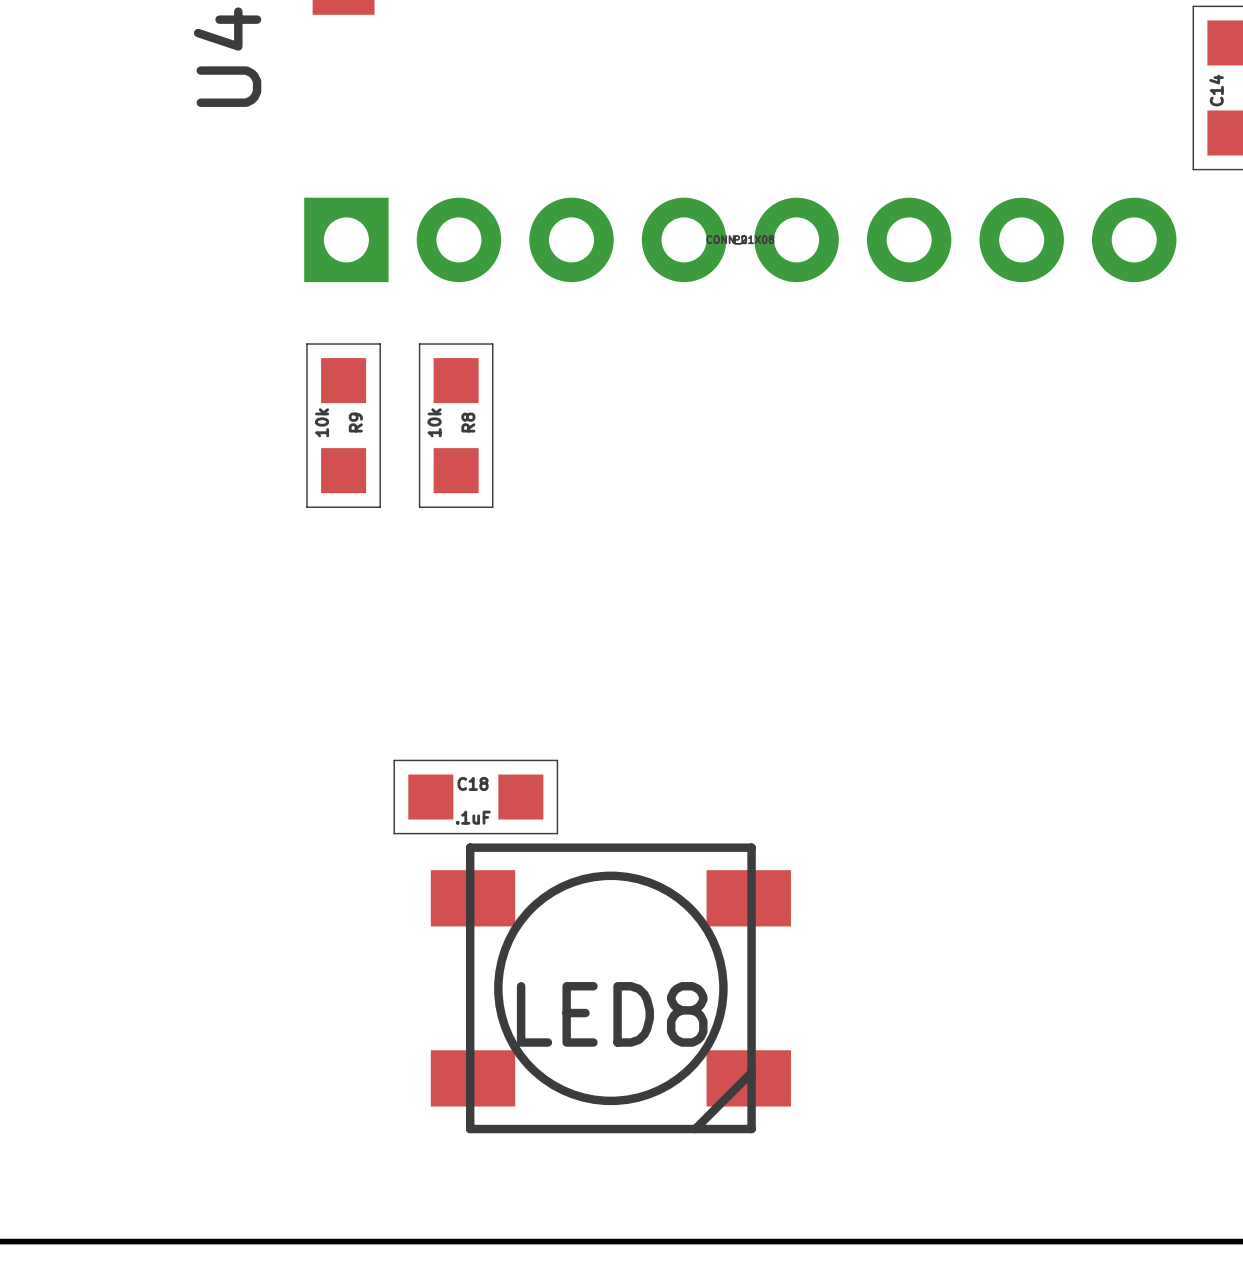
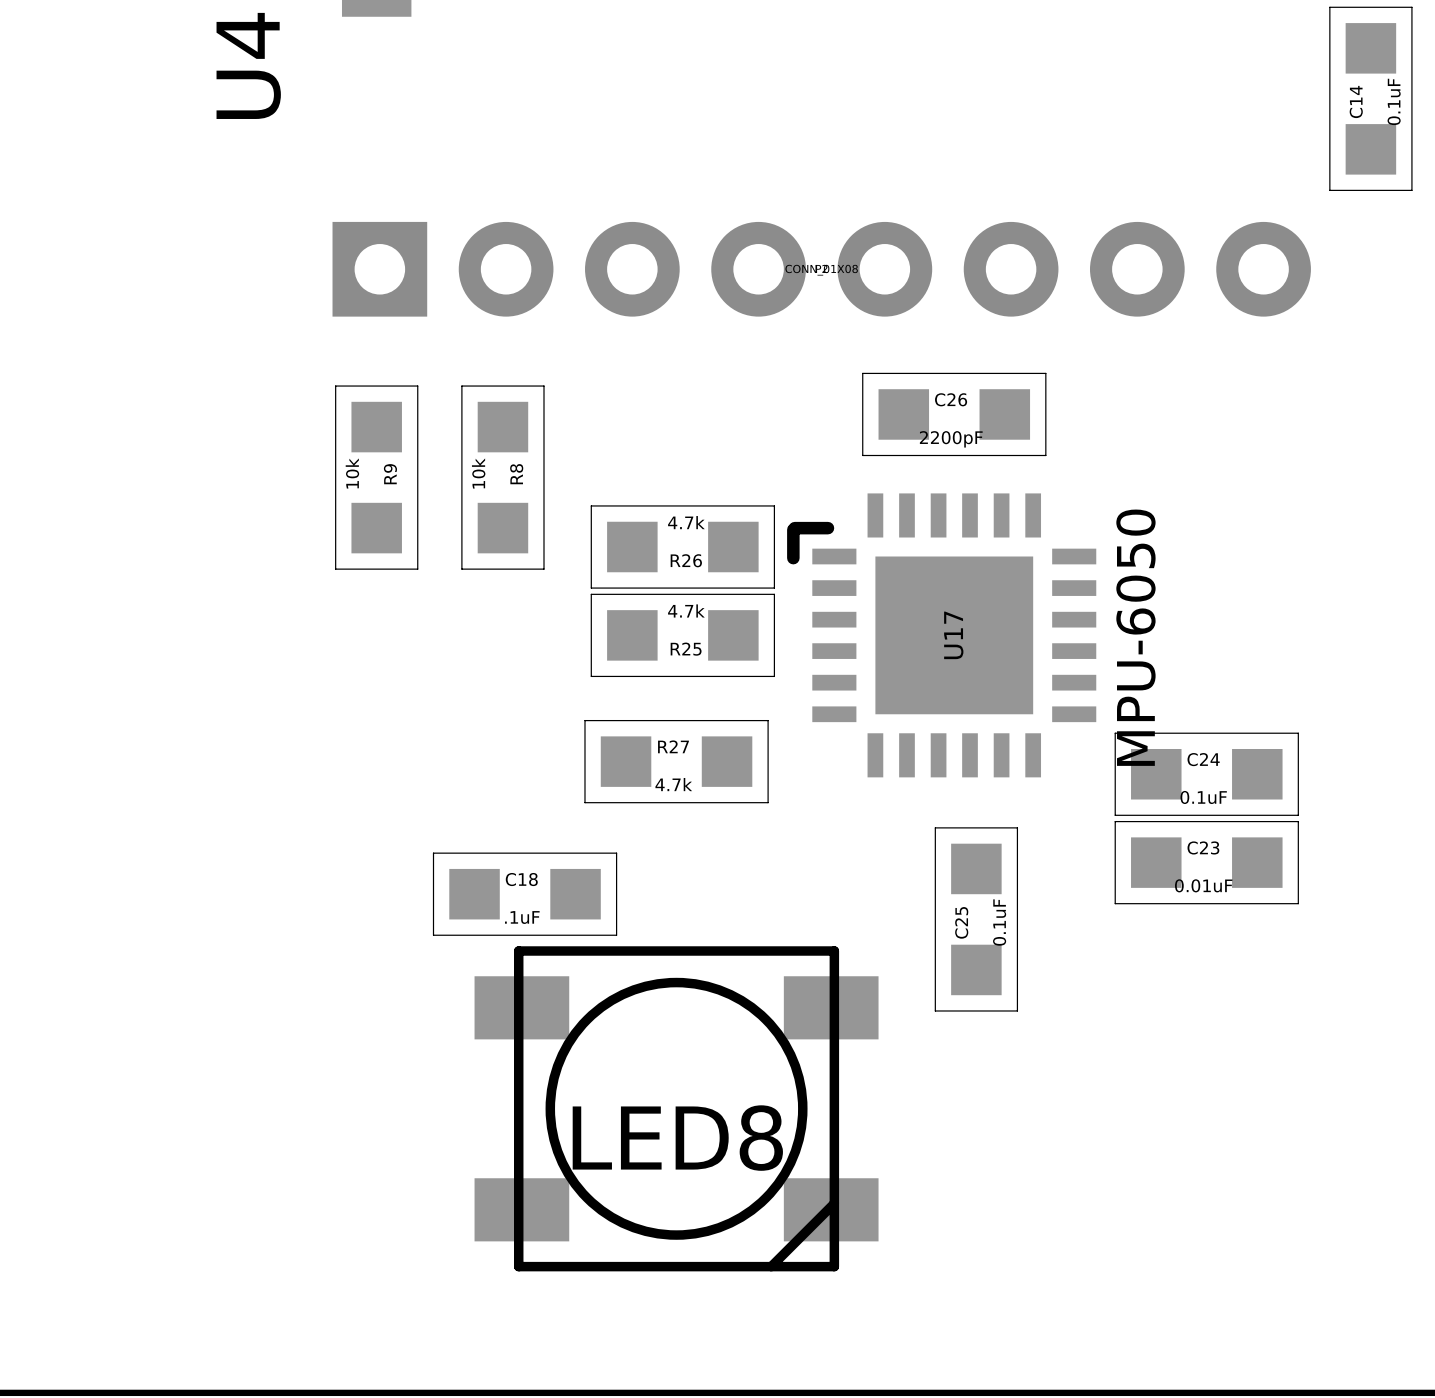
C26: none -> 2200pF (954, 414)
R26: none -> 4.7k (682, 547)
R25: none -> 4.7k (682, 635)
U17: none -> MPU-6050 (941, 635)
R27: none -> 4.7k (676, 761)
C24: none -> 0.1uF (1206, 774)
C23: none -> 0.01uF (1206, 862)
C25: none -> 0.1uF (976, 919)

